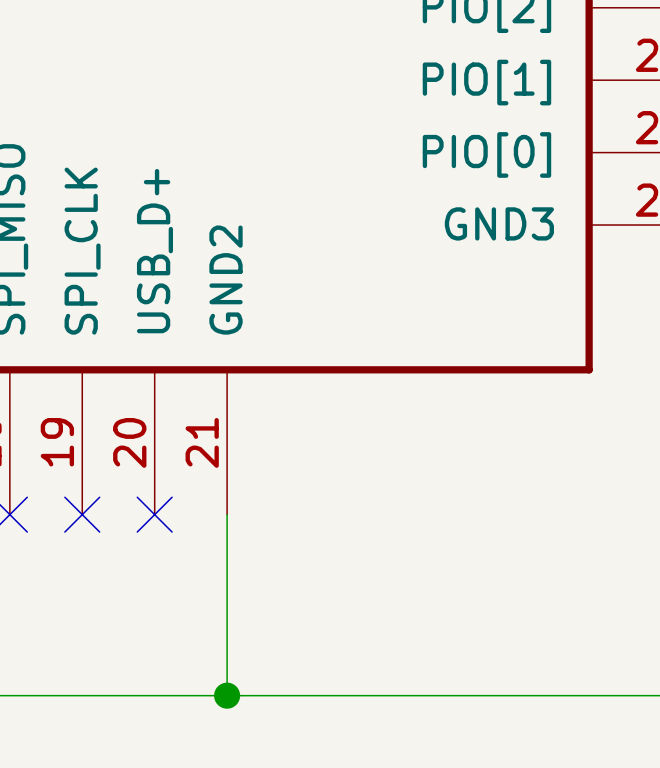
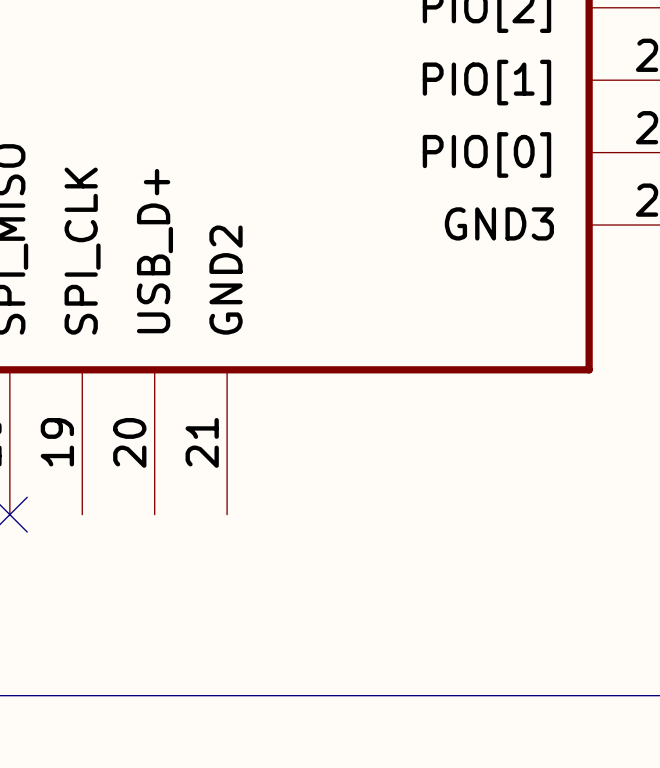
no-connect mark: (82, 514) -> none
no-connect mark: (154, 514) -> none
wire: (227, 514) (227, 695) -> none
junction: (227, 695) -> none

